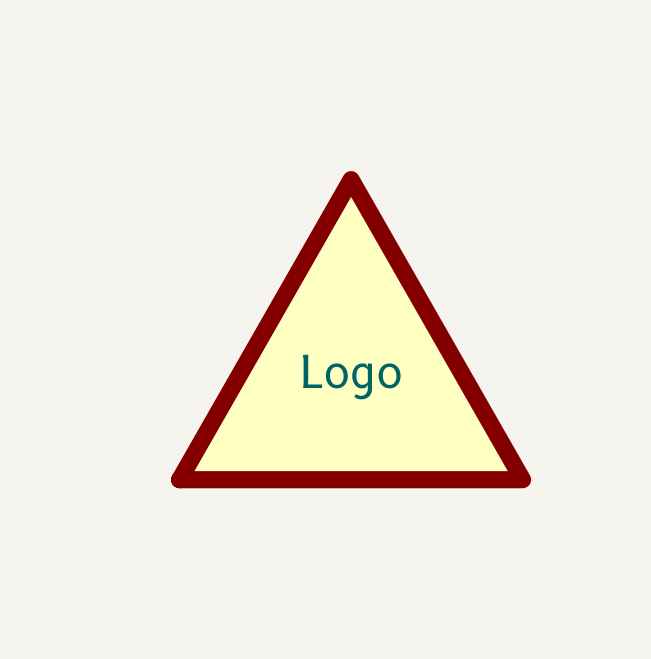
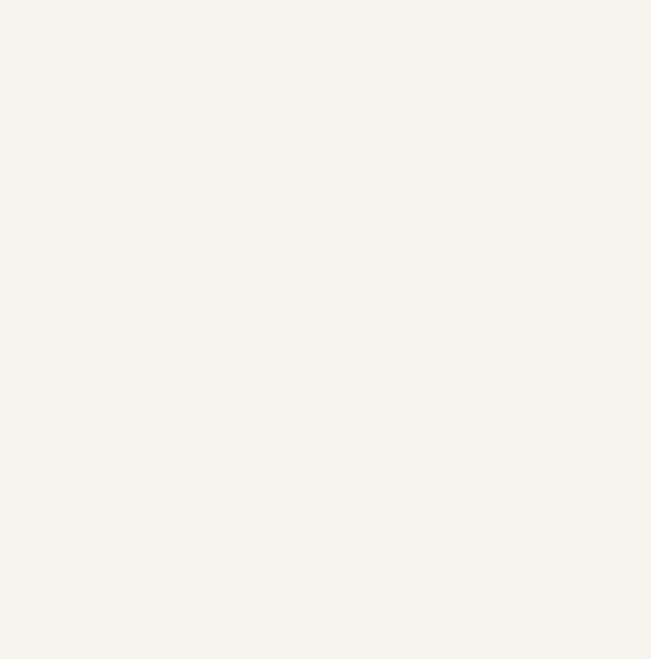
part: (351, 329) -> none

